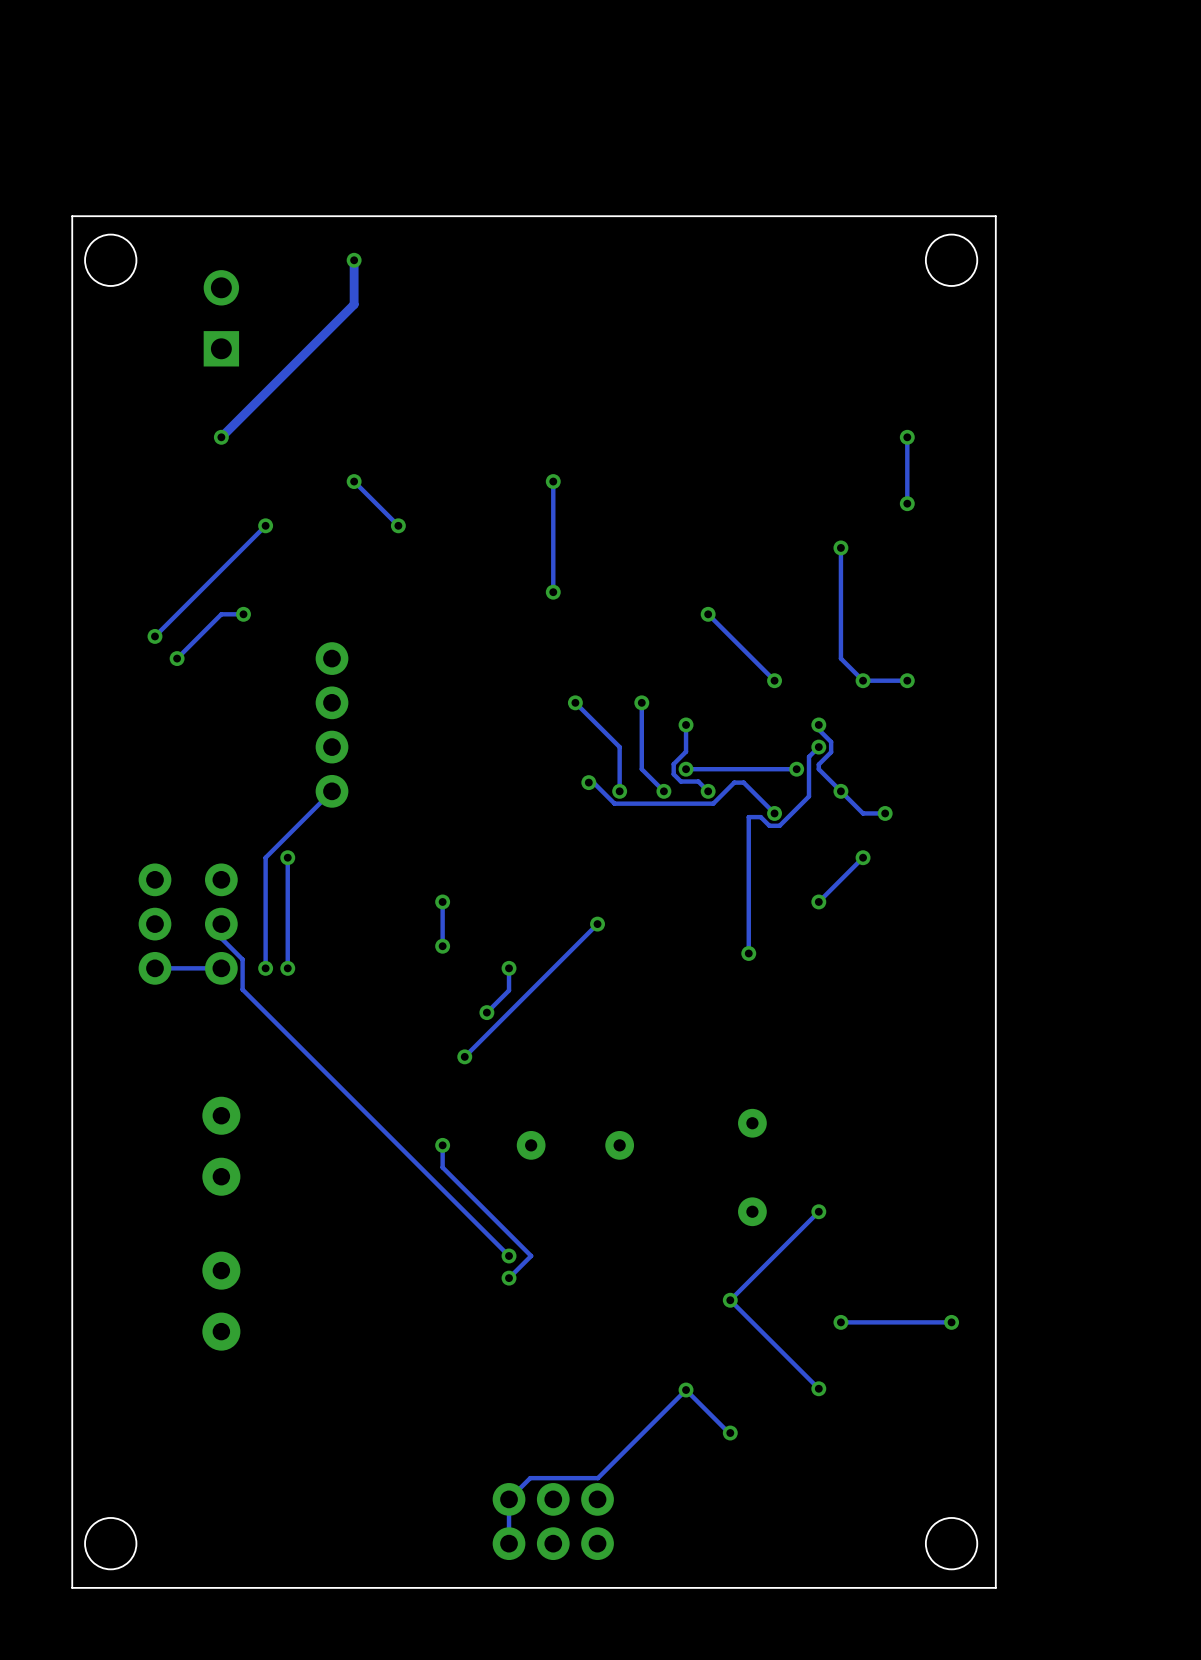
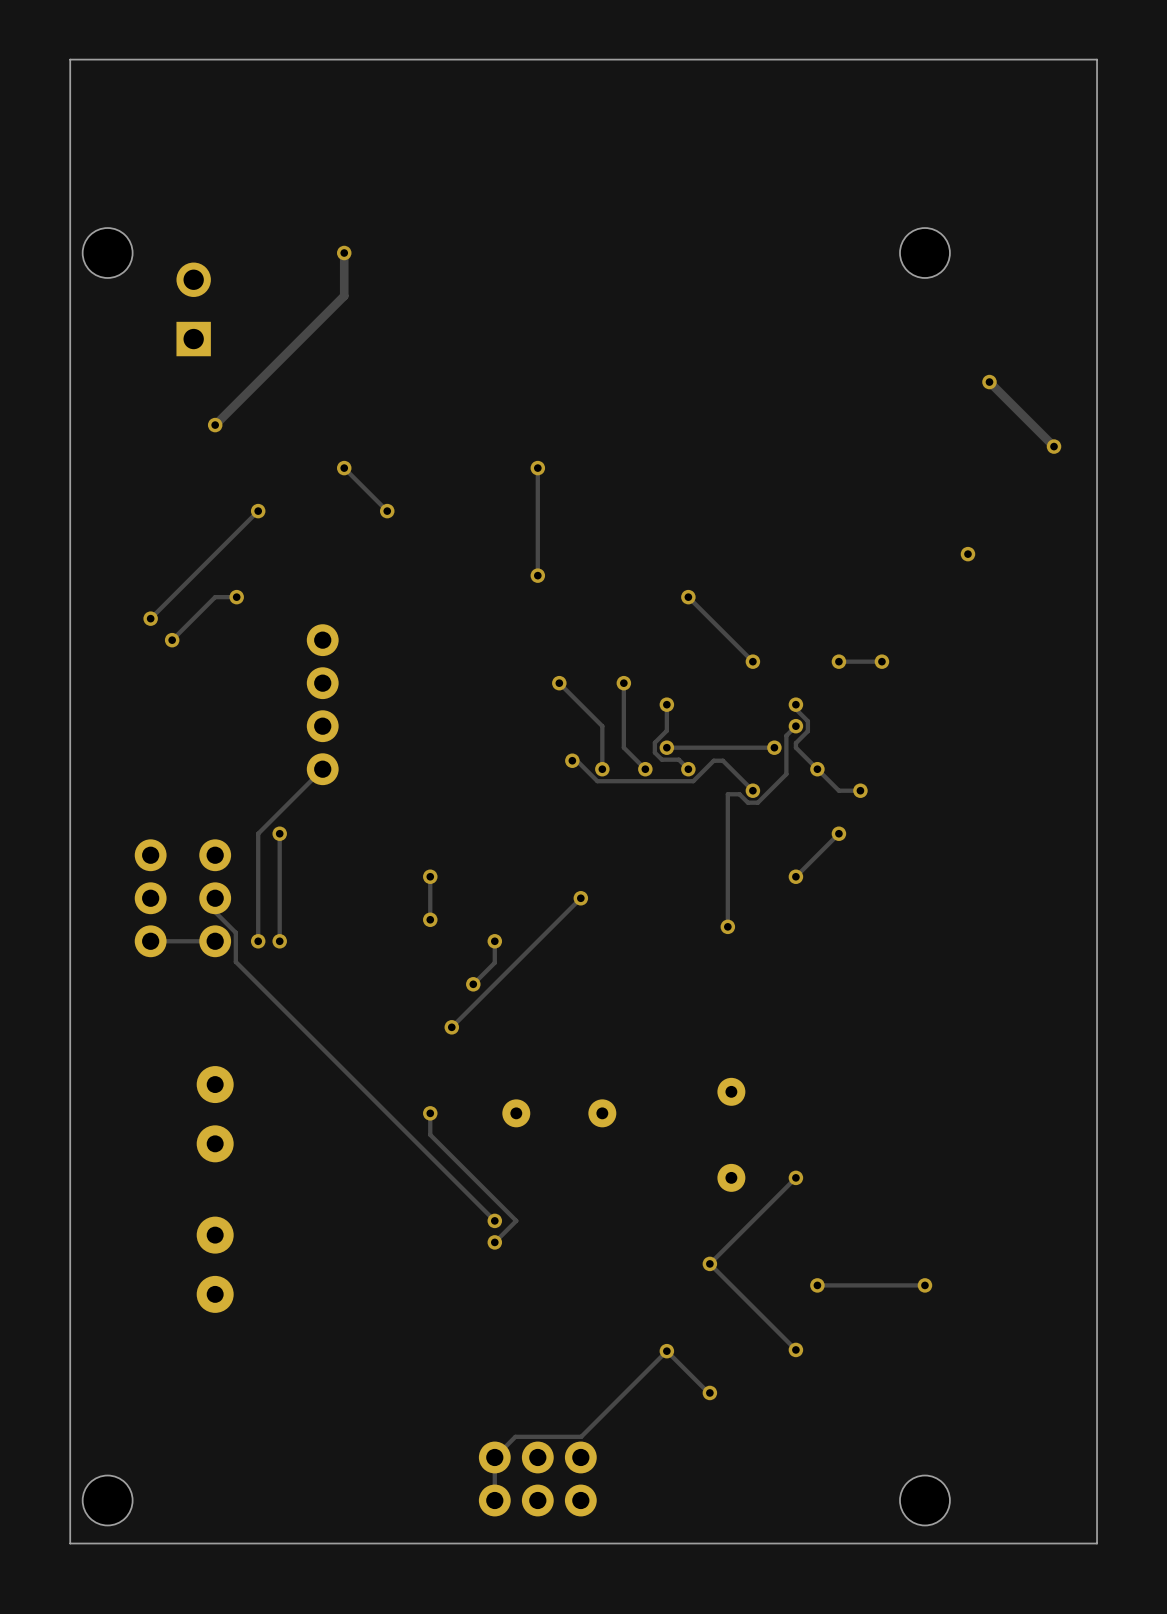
board edge: (72, 216) (995, 216) (995, 1587) -> (70, 210) (70, 59) (1097, 59) (1097, 1543) (967, 1543)
part position: (221, 318) -> (193, 309)
track: none -> (989, 382) (1054, 446)
via: none -> (989, 382)
track: (907, 437) (907, 503) -> none
via: (907, 437) -> none
via: none -> (1054, 446)
via: (907, 503) -> none
track: (840, 547) (840, 658) (863, 680) -> none
via: (840, 547) -> none
via: none -> (967, 554)

